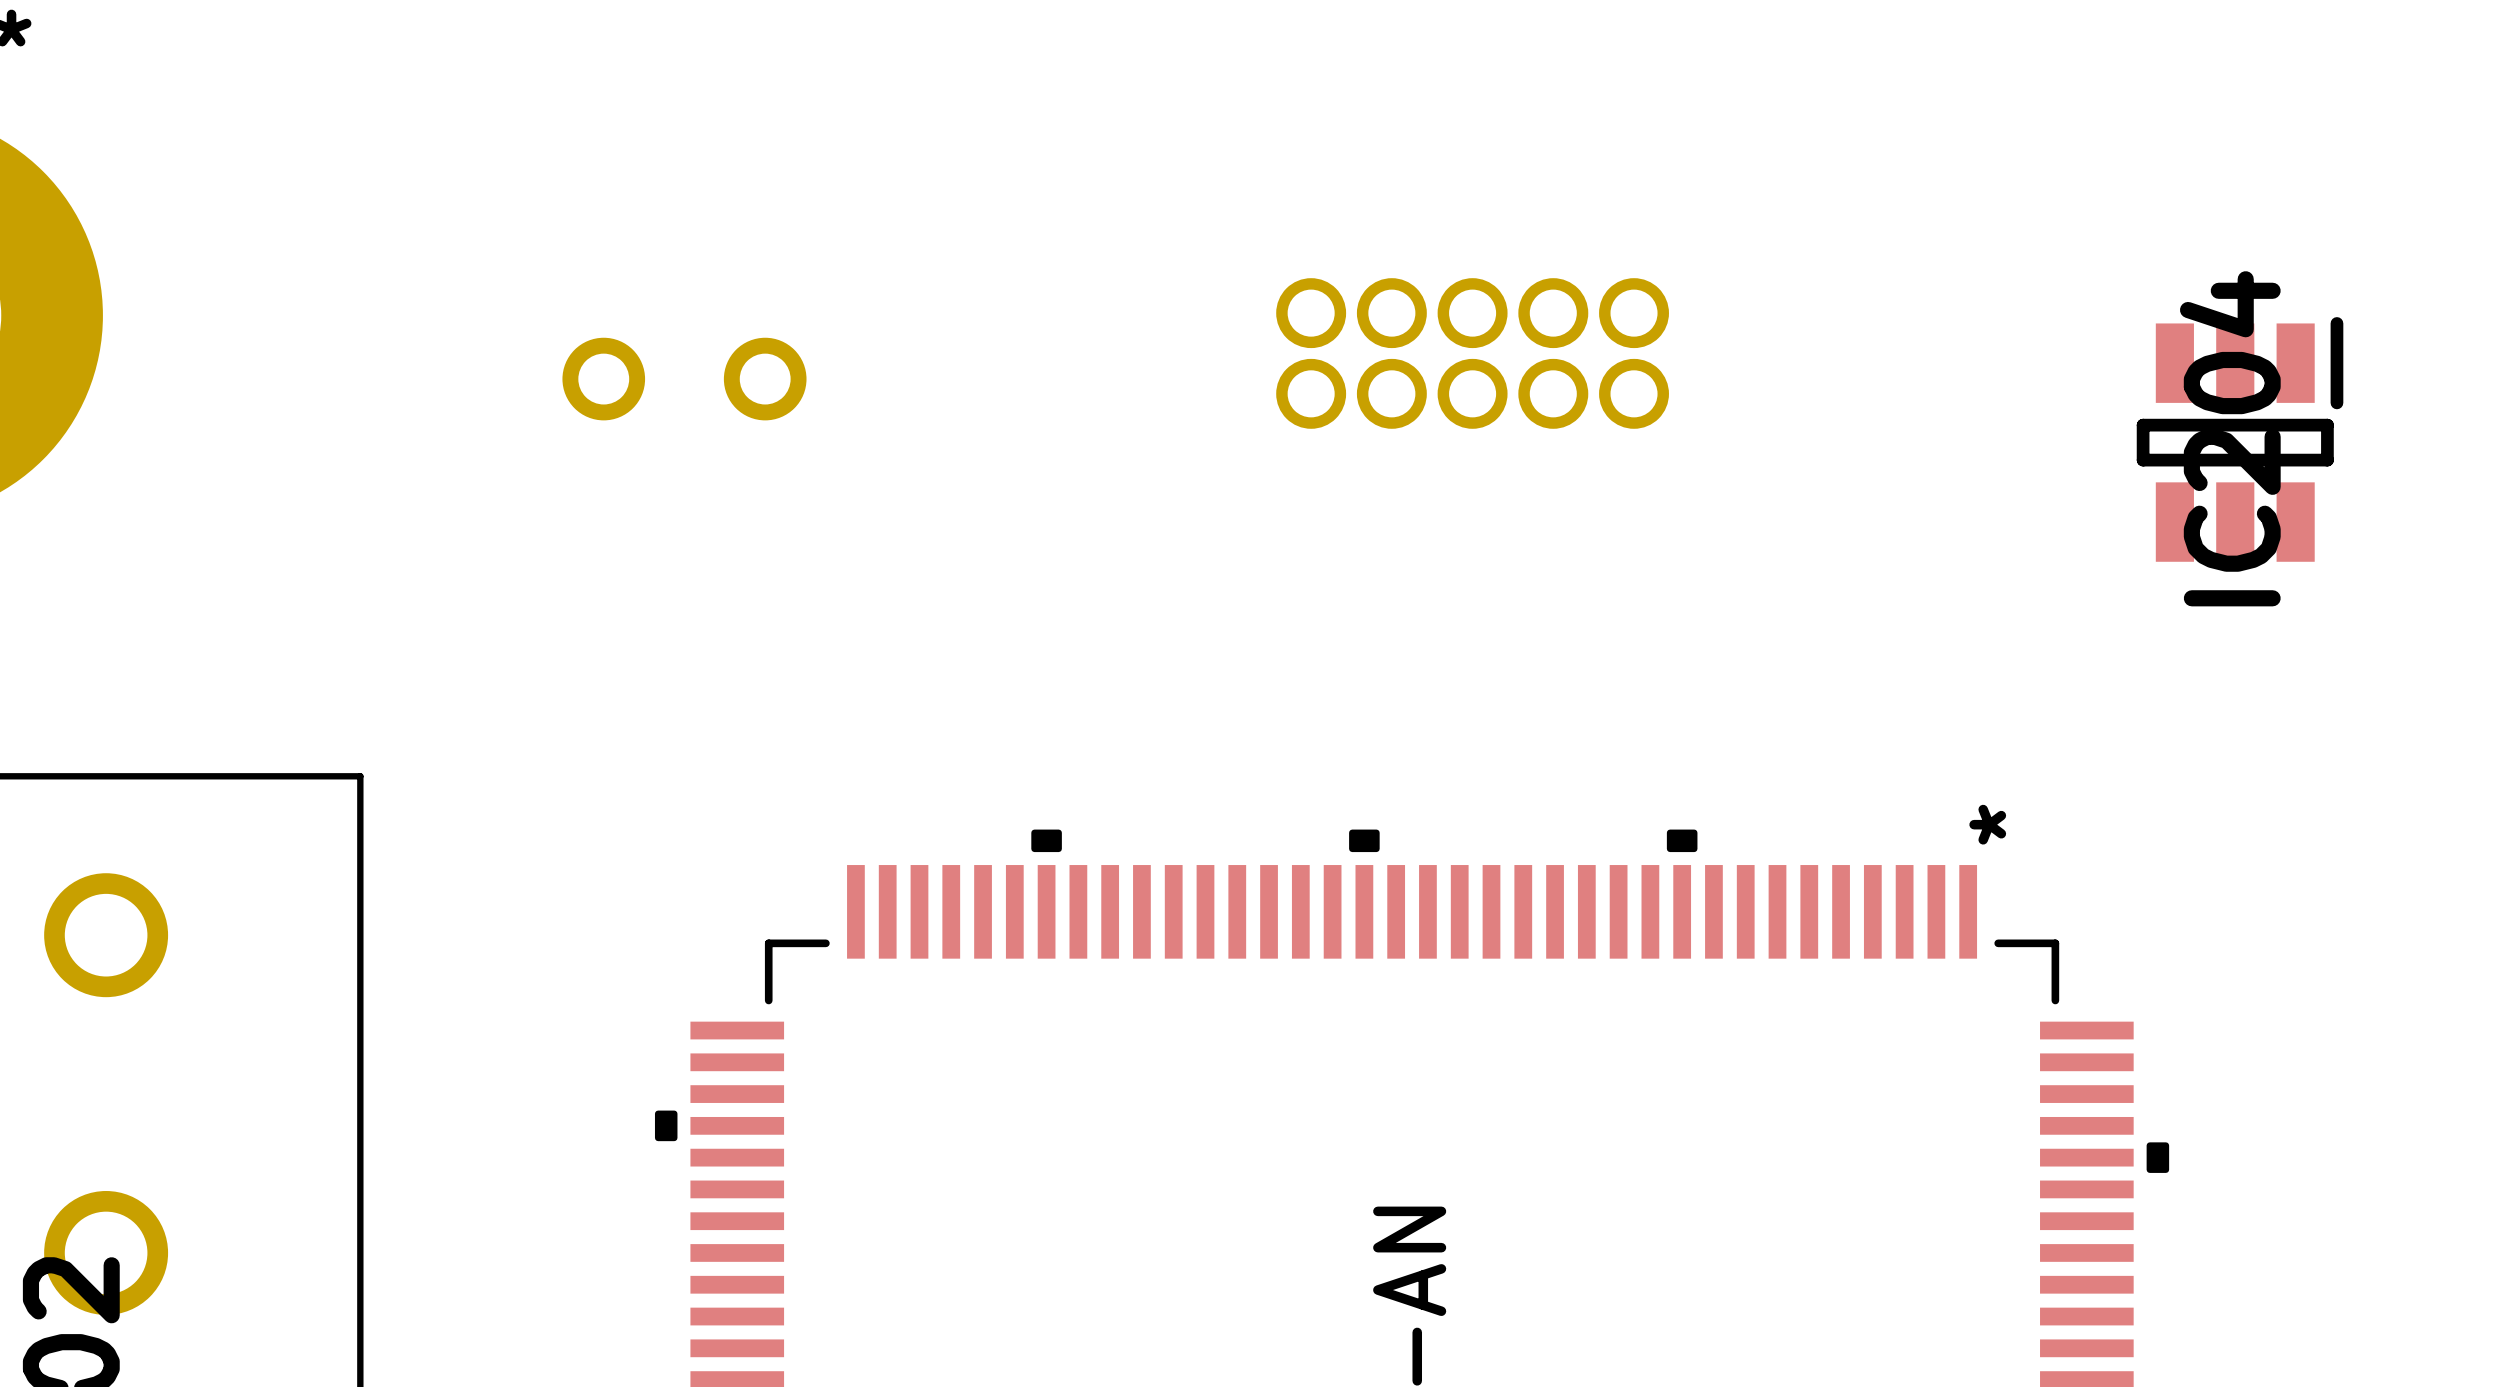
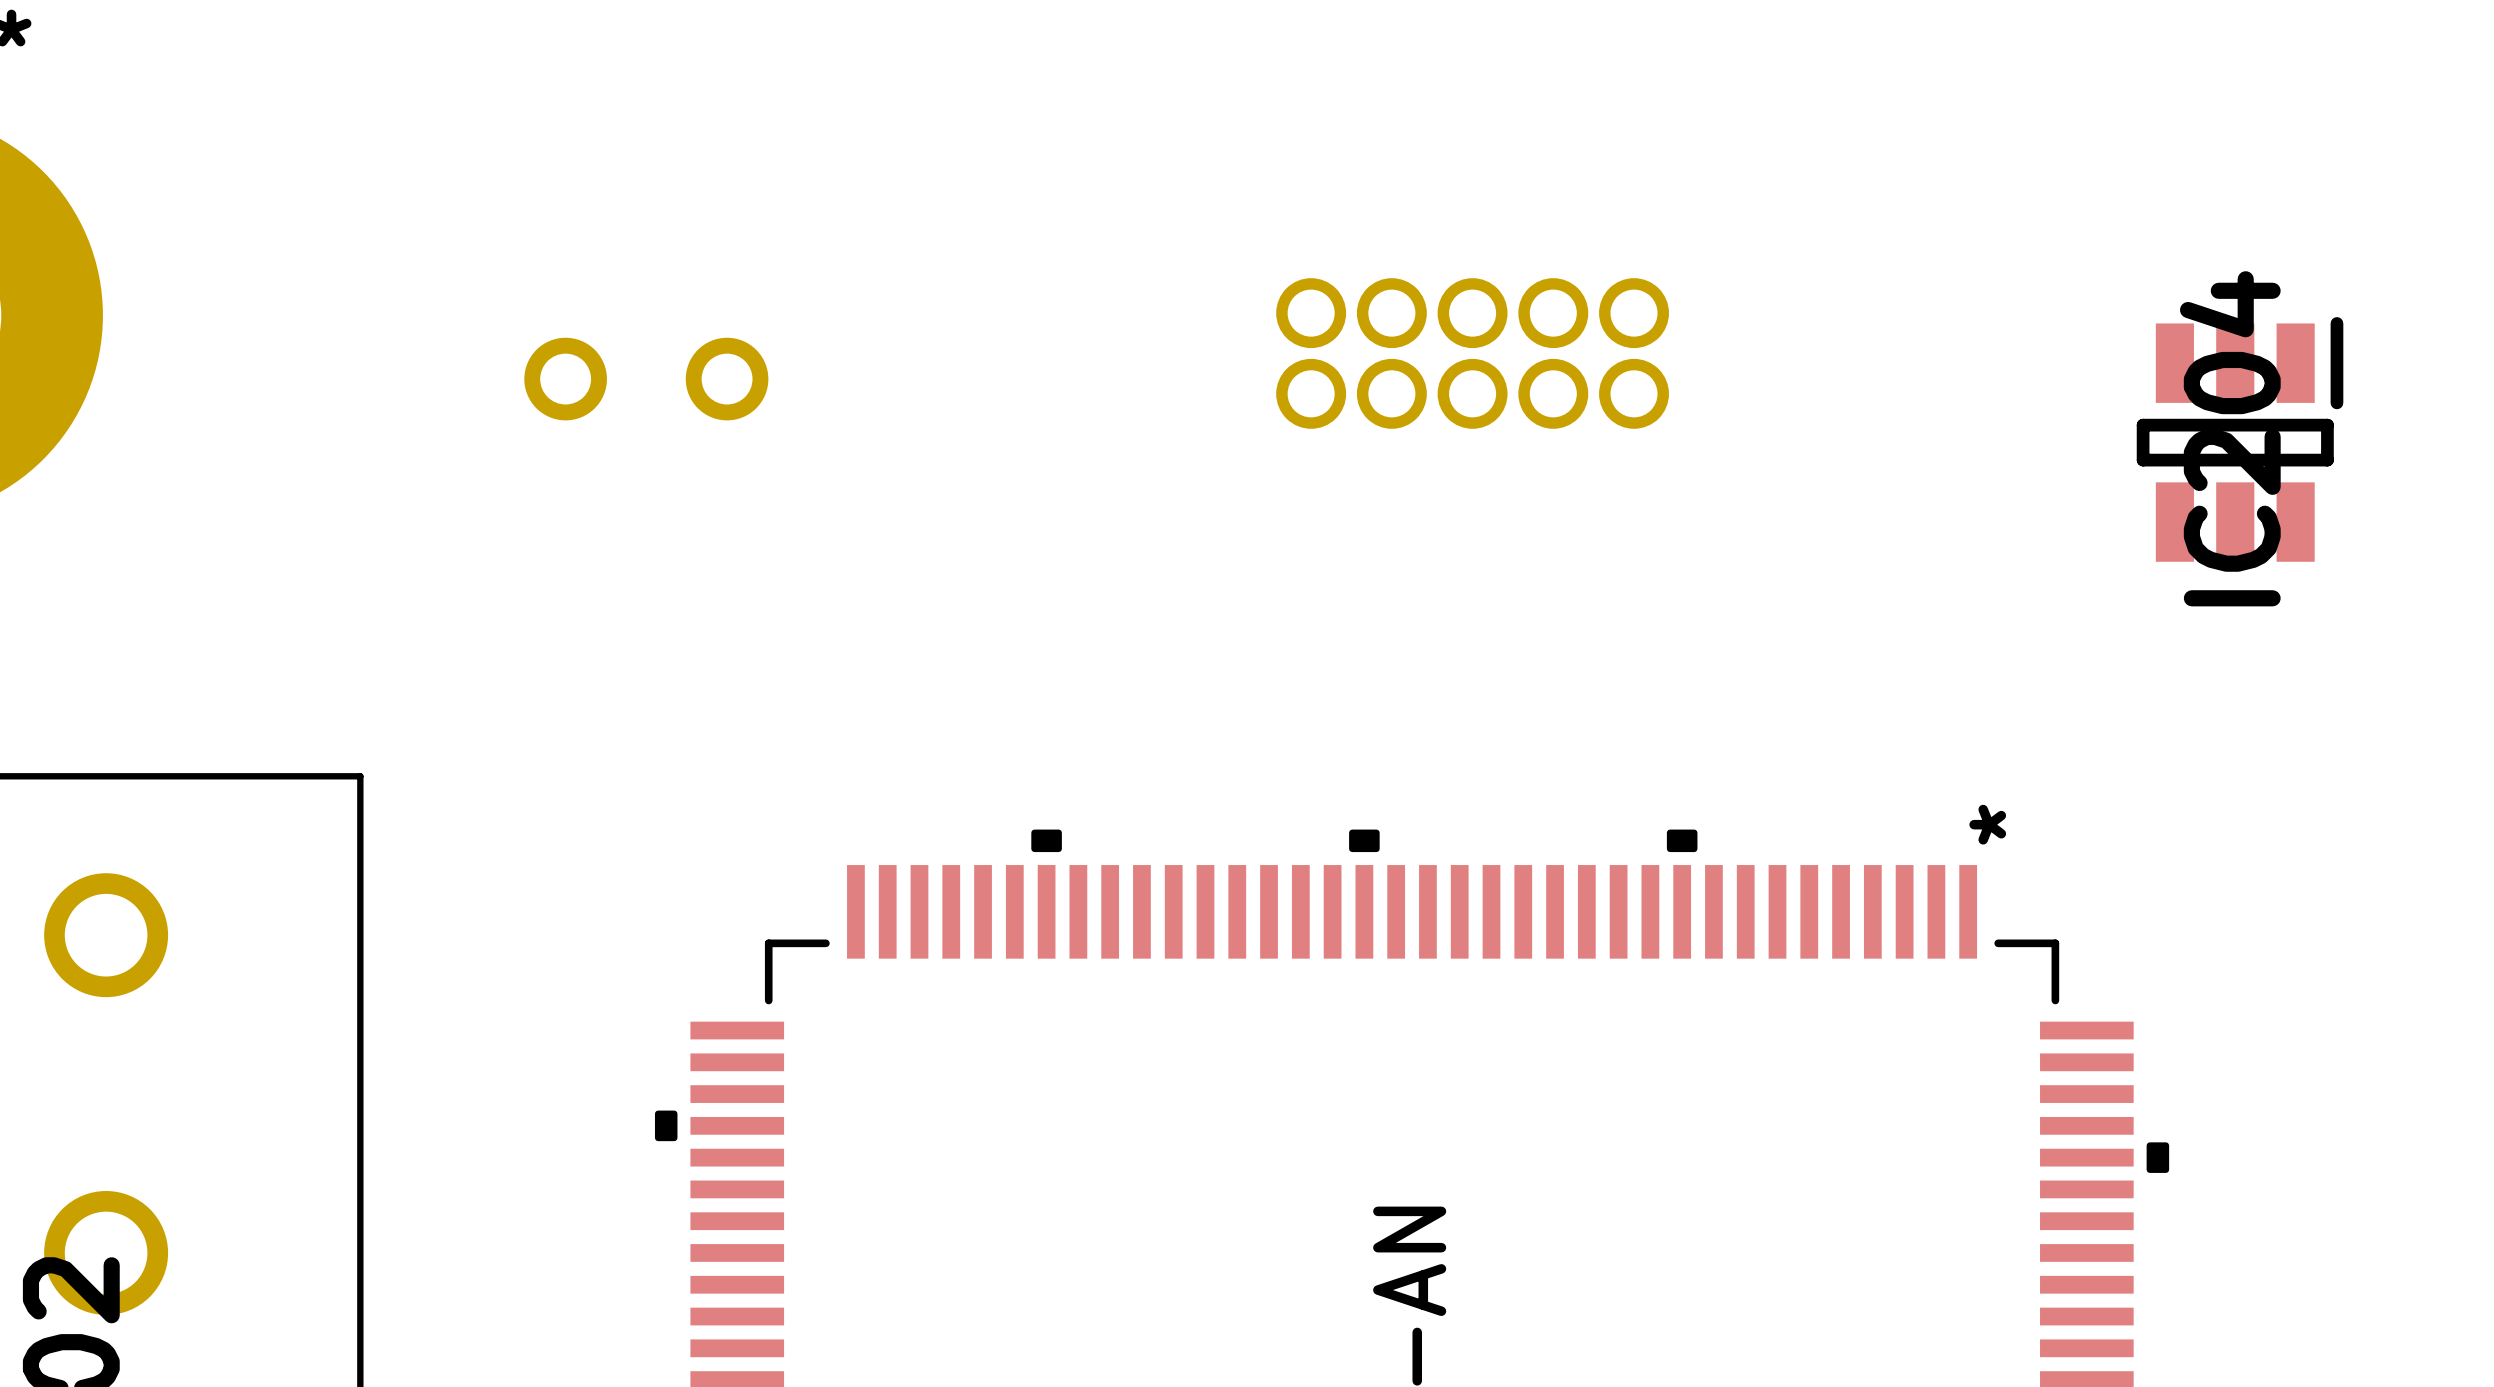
part position: (684, 379) -> (646, 379)

